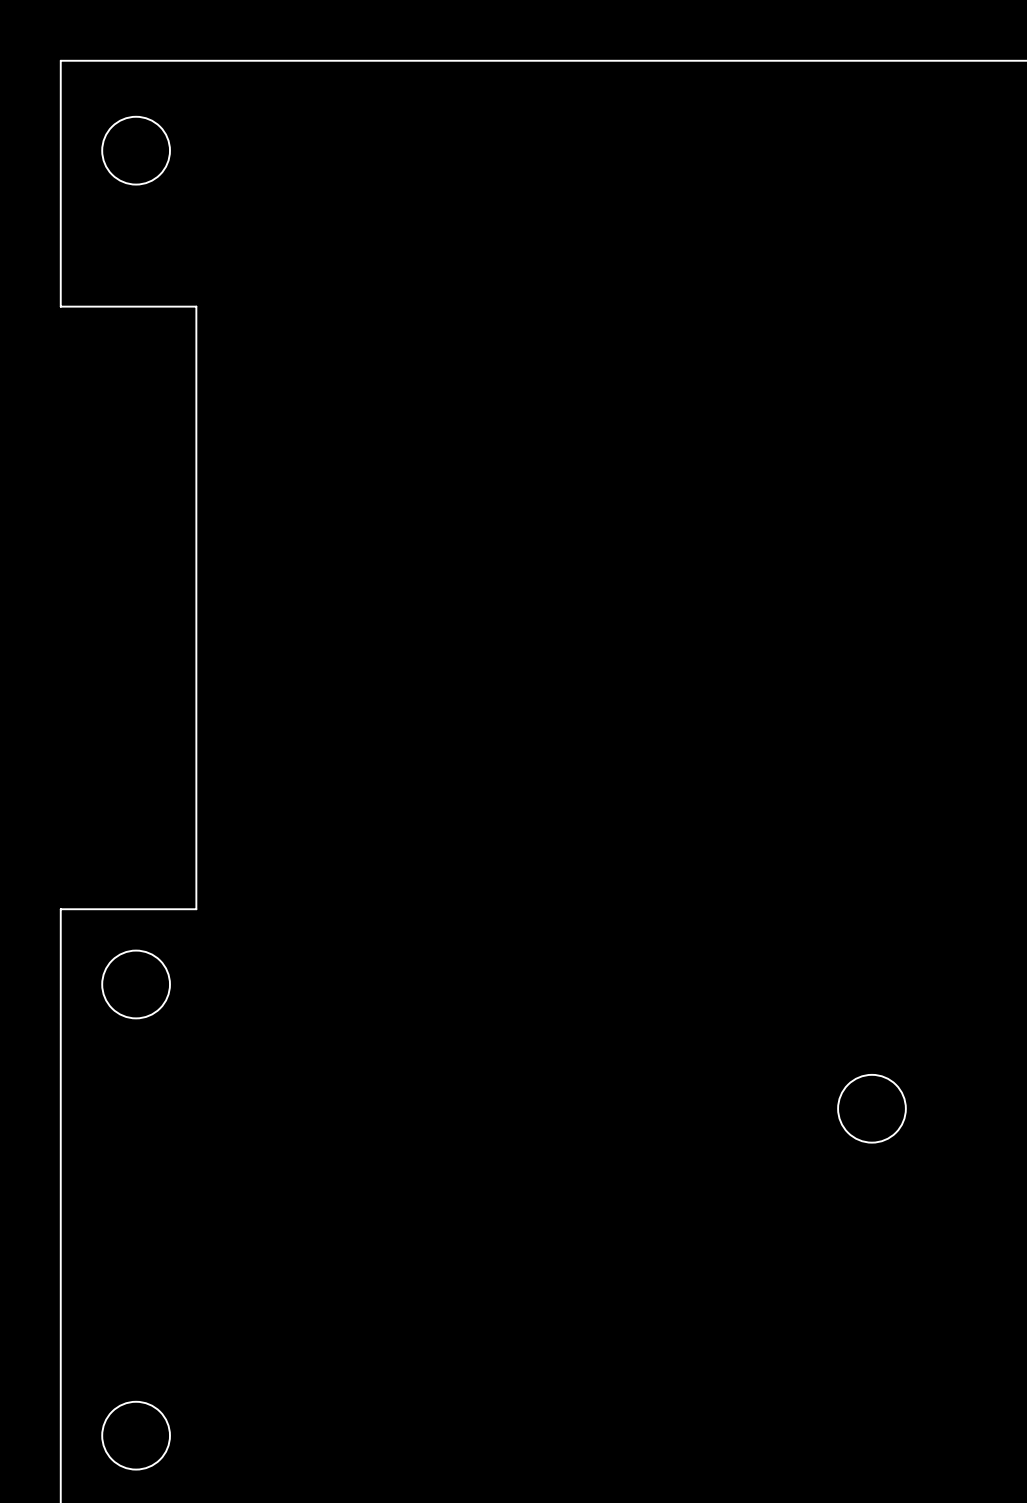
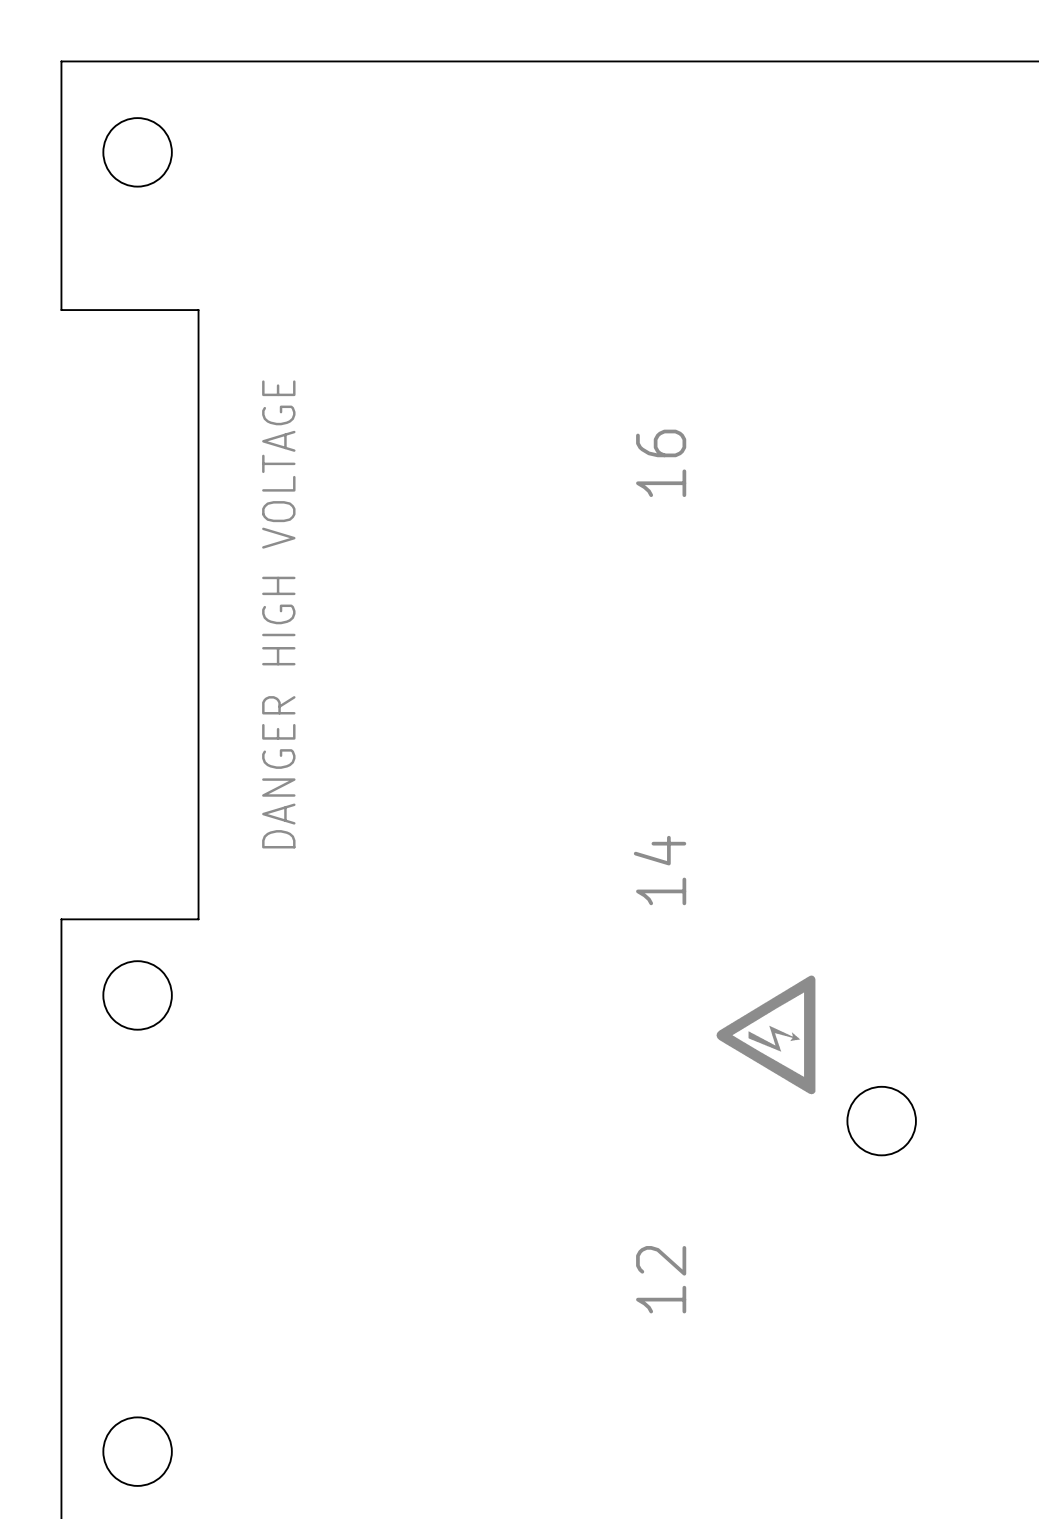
text: none -> 16 (661, 463)
text: none -> DANGER HIGH VOLTAGE (278, 614)
text: none -> 14 (660, 870)
drawing: none -> [716, 975, 816, 1095]
text: none -> 12 (661, 1279)

